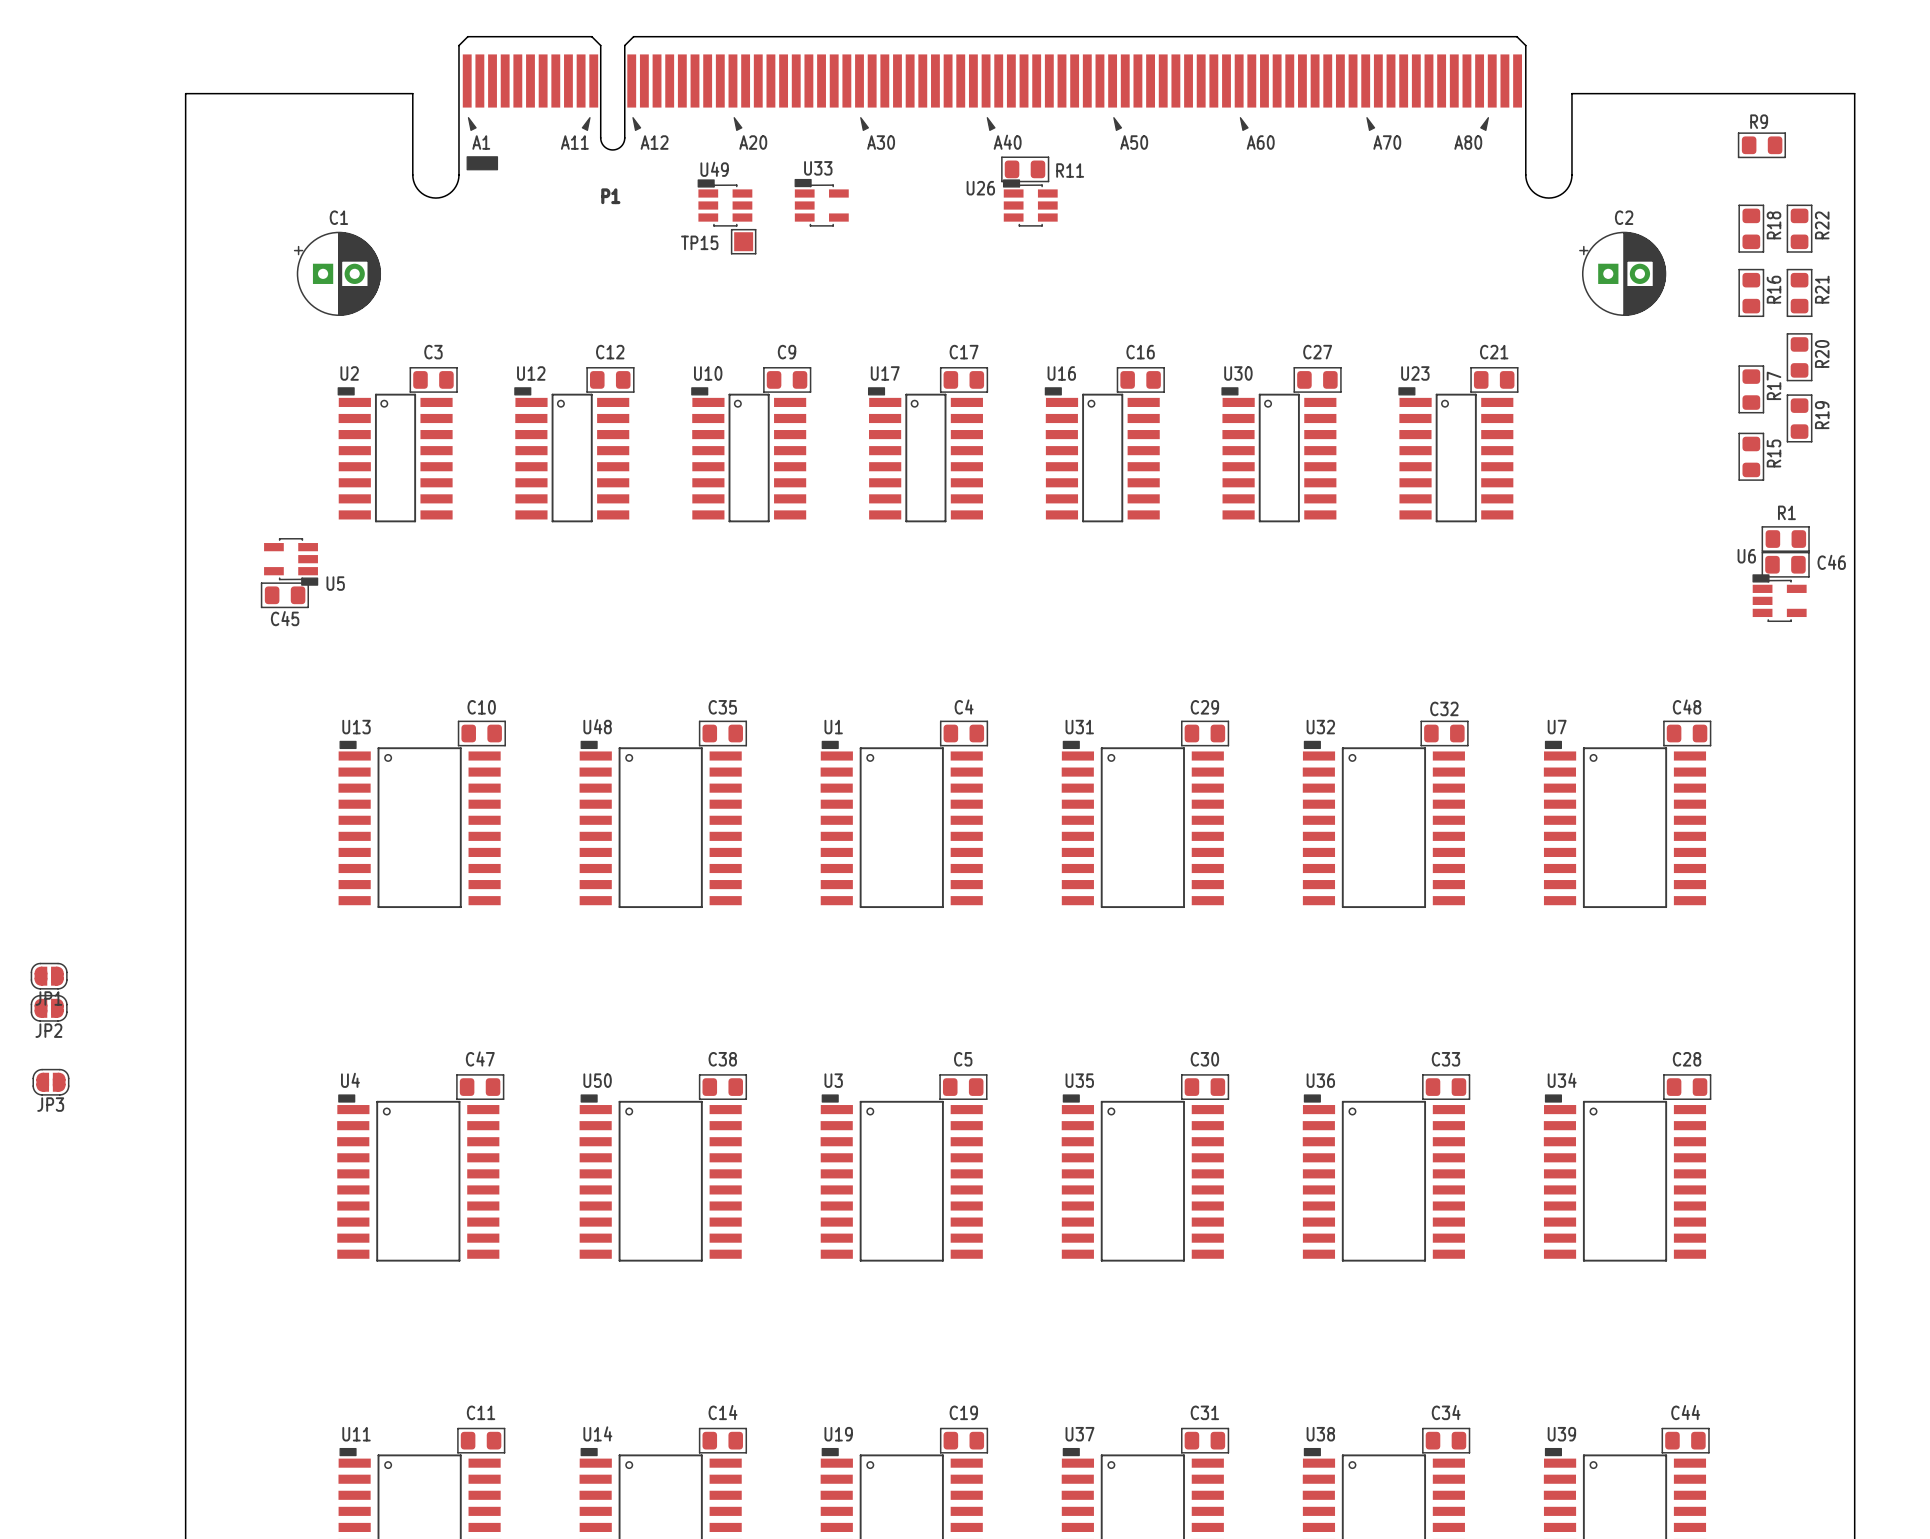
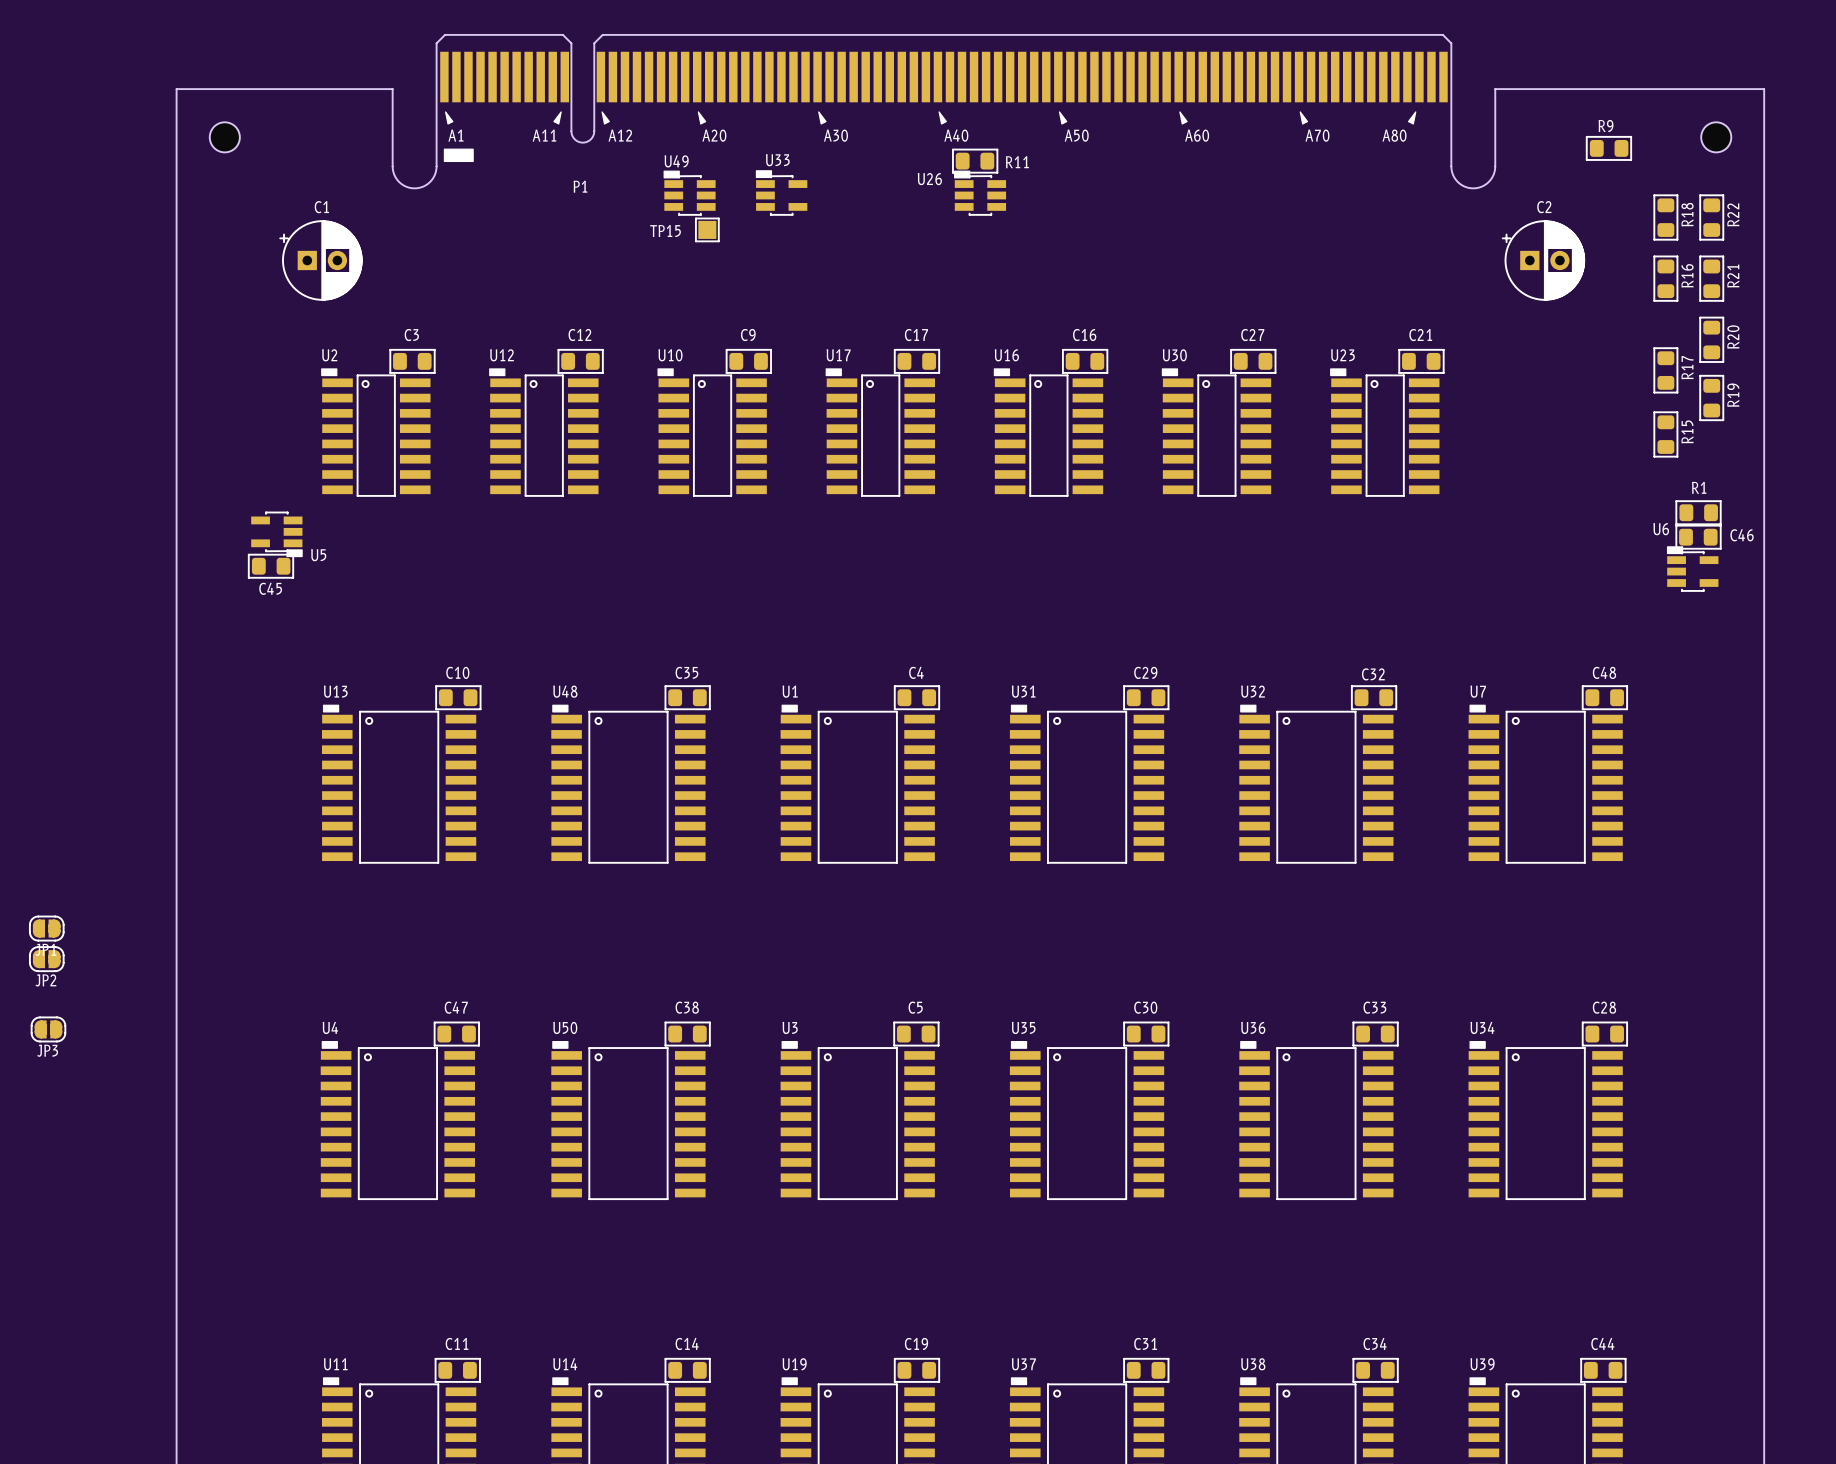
part: none -> (224, 137)
part: none -> (1716, 137)
R9 position: (1761, 145) -> (1608, 148)

